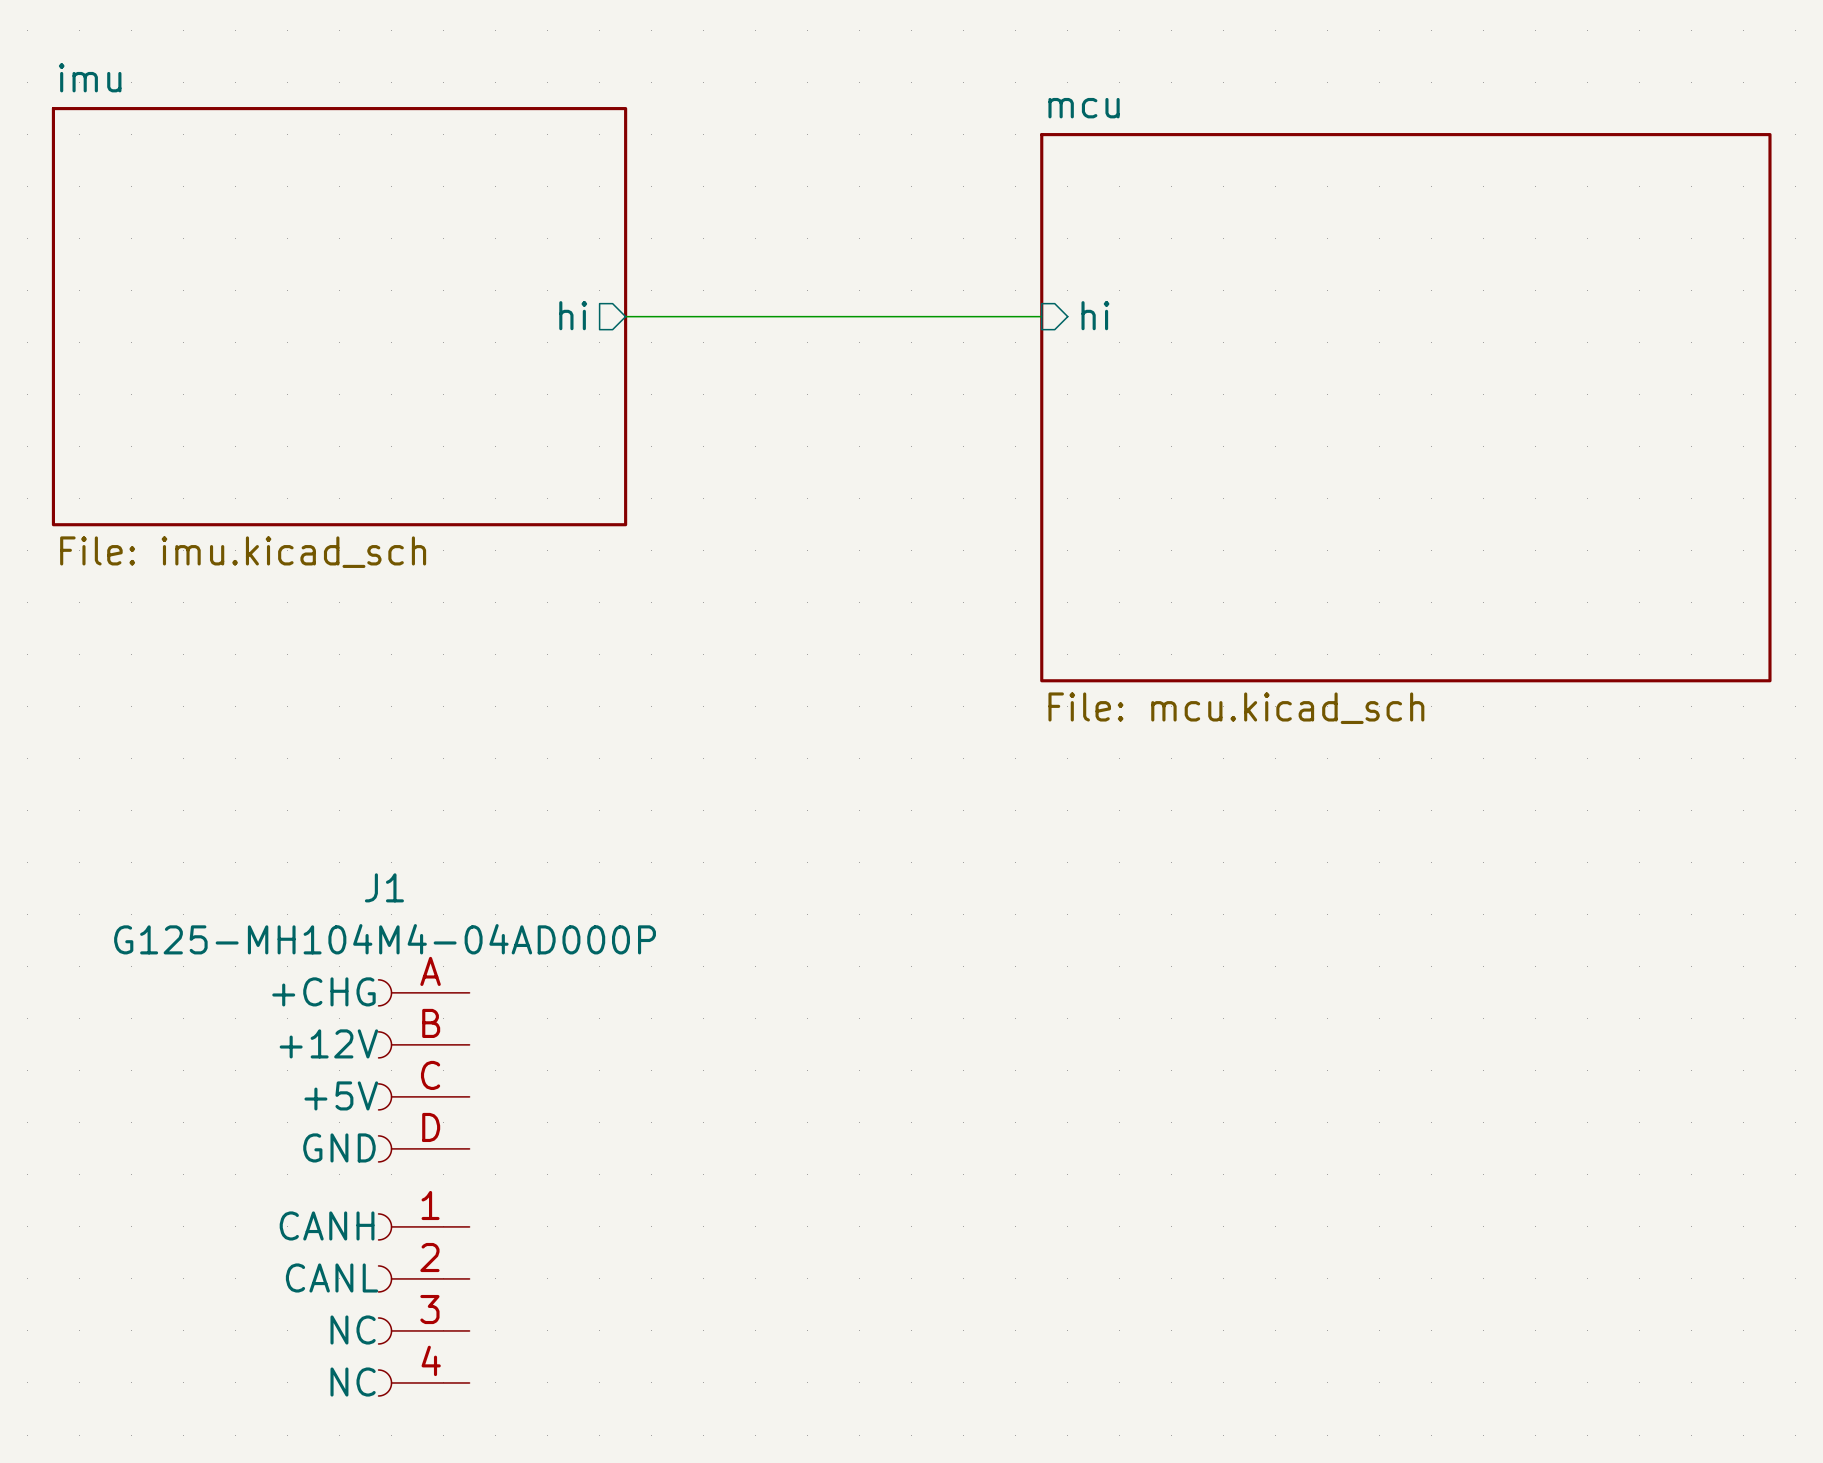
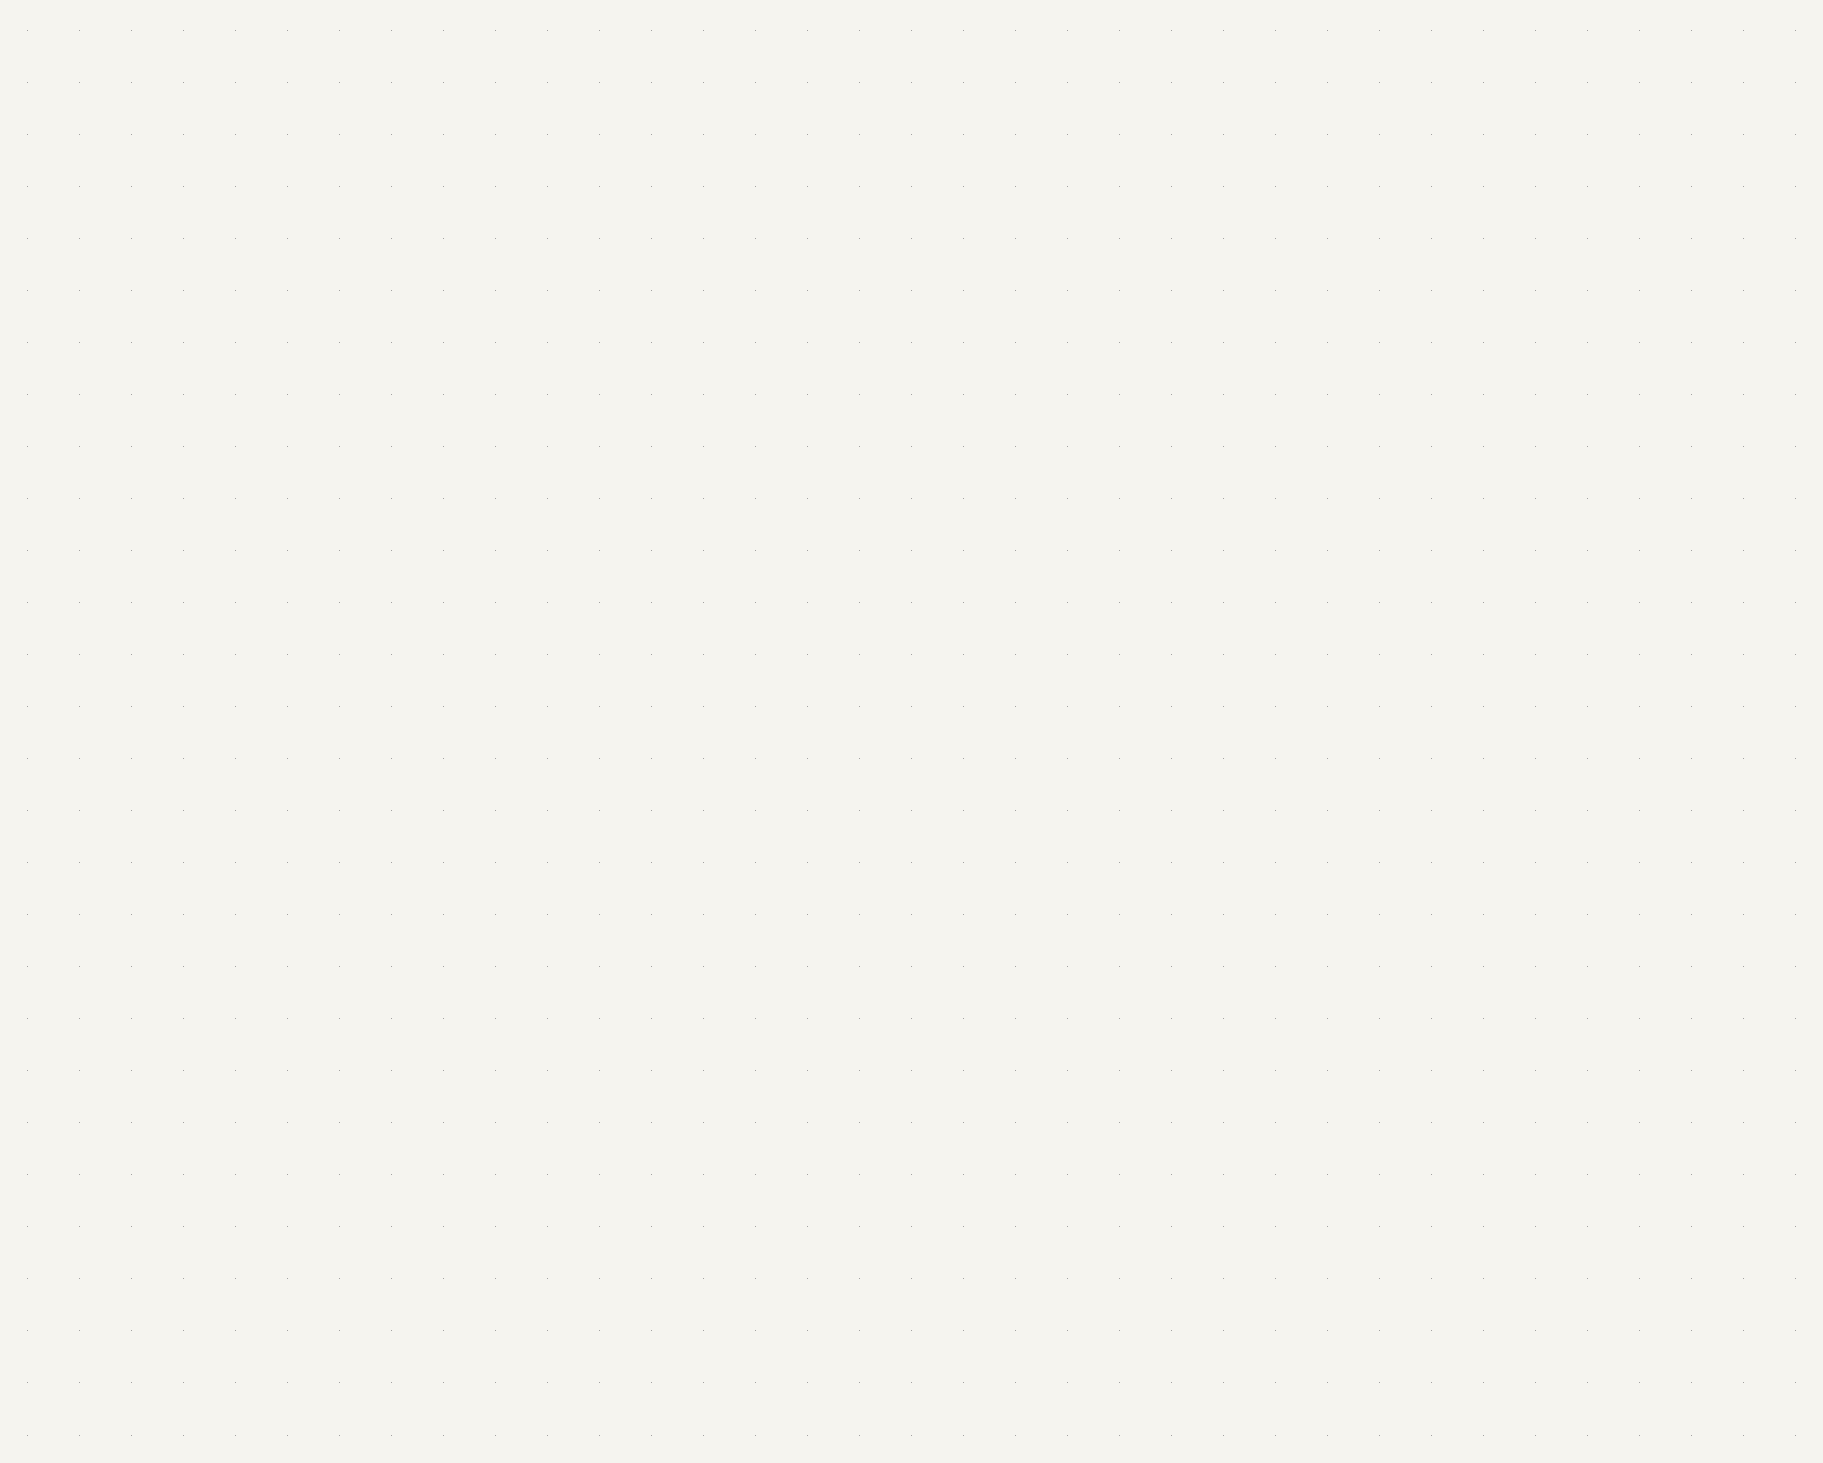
sheet pin: hi (573, 315) -> none
sheet pin: hi (1095, 315) -> none
sheet imu: File: imu.kicad_sch (339, 316) -> none
wire: (625, 316) (1041, 316) -> none
sheet mcu: File: mcu.kicad_sch (1405, 407) -> none
J1: G125-MH104M4-04AD000P (424, 1187) -> none

